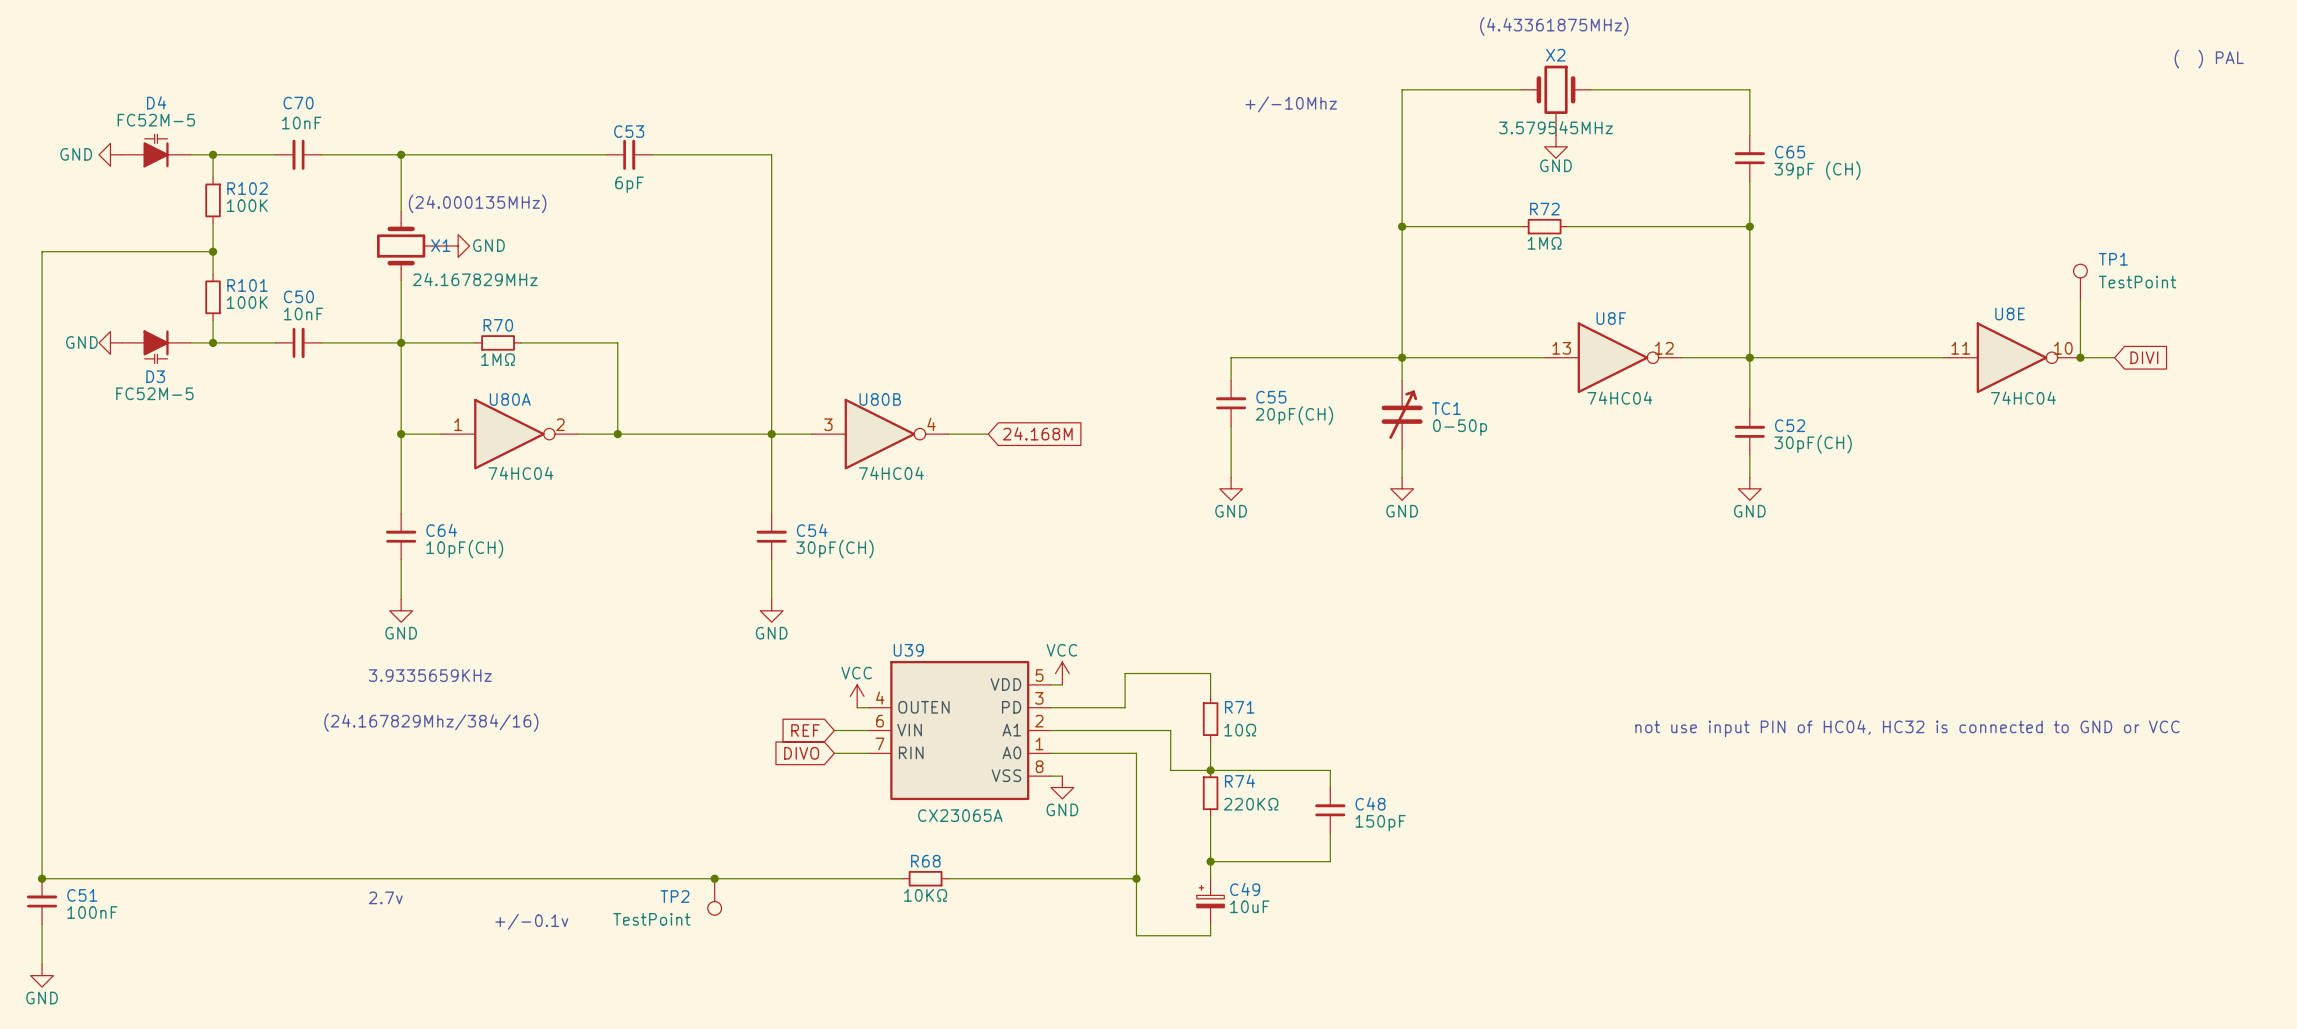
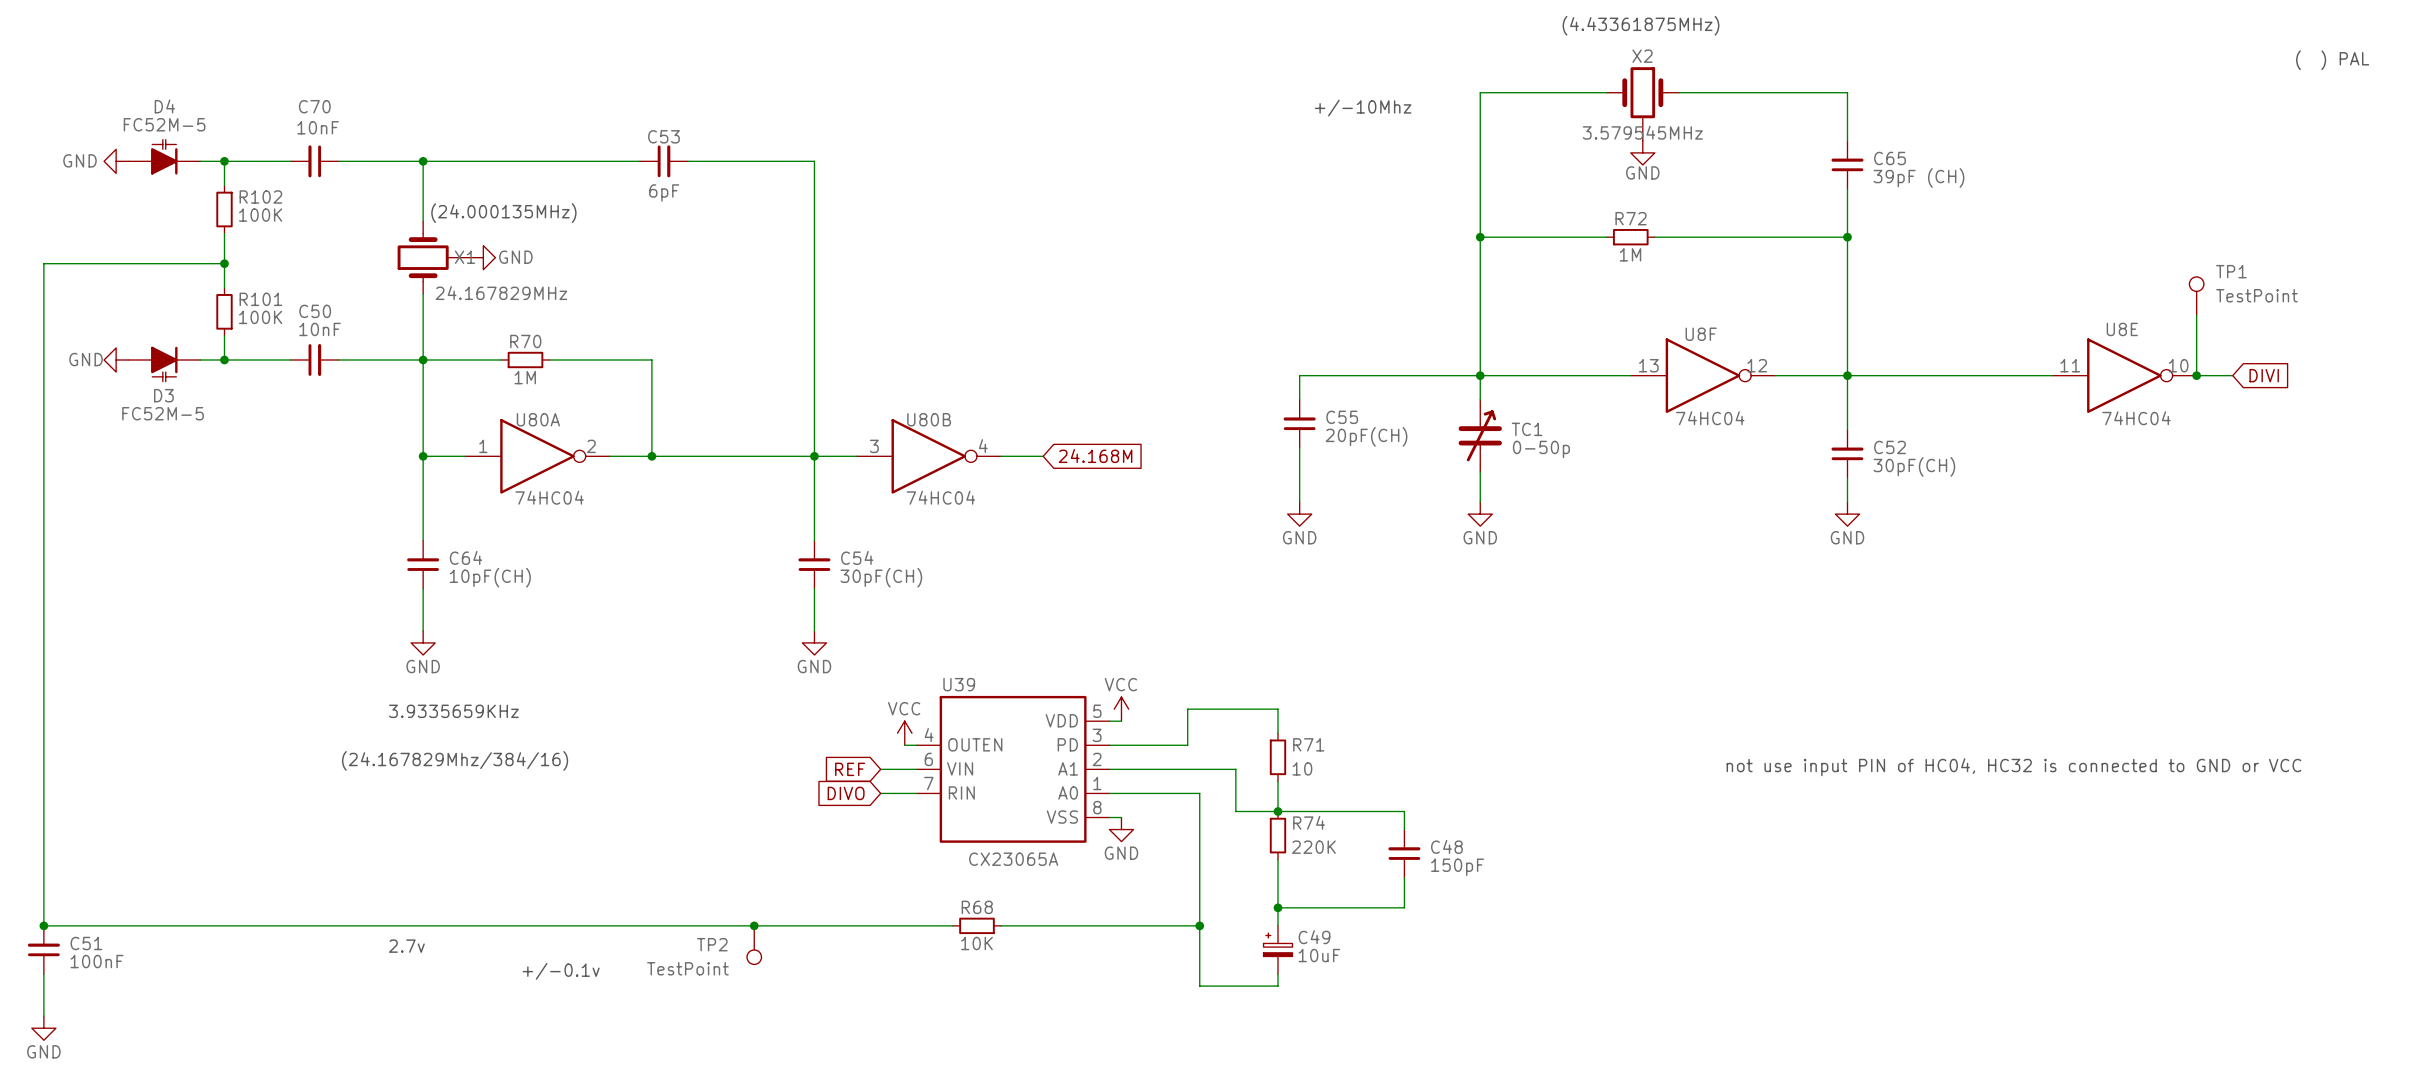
R72 value: 1MΩ (1544, 243) -> 1M (1630, 254)
R70 value: 1MΩ (498, 359) -> 1M (525, 377)
R71 value: 10Ω (1240, 730) -> 10 (1302, 768)
R74 value: 220KΩ (1251, 804) -> 220K (1313, 847)
R68 value: 10KΩ (925, 895) -> 10K (976, 943)

